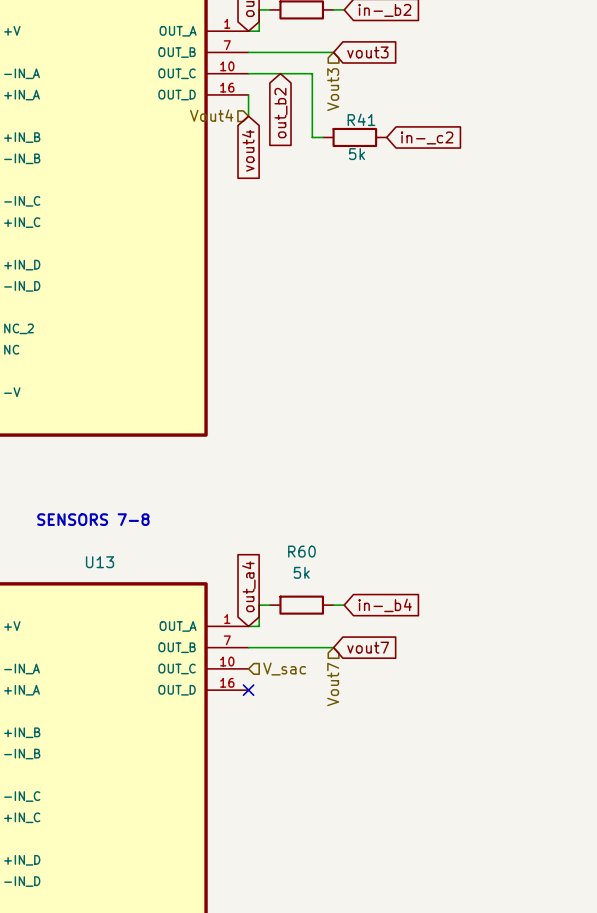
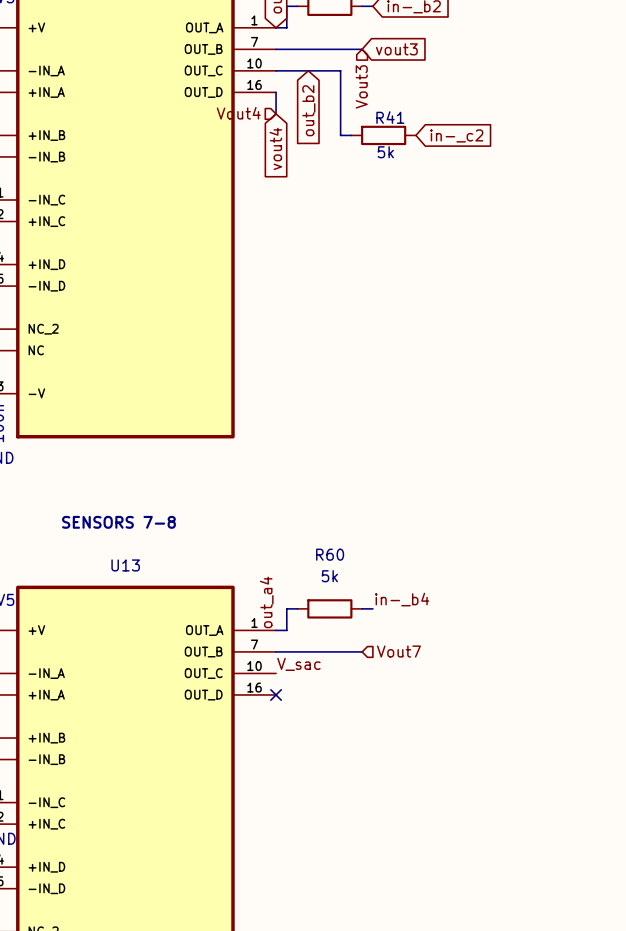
global label: out_a4 (248, 586) -> none
label: none -> in-_b4 (402, 599)
label: none -> out_a4 (266, 602)
global label: in-_b4 (385, 605) -> none
global label: vout7 (368, 647) -> none
label: none -> V_sac (298, 664)
hierarchical label: V_sac (284, 669) -> none
hierarchical label rotation: 0° (333, 684) -> 90° counterclockwise (398, 651)
hierarchical label position: Vout7 (333, 684) -> Vout7 (398, 651)

